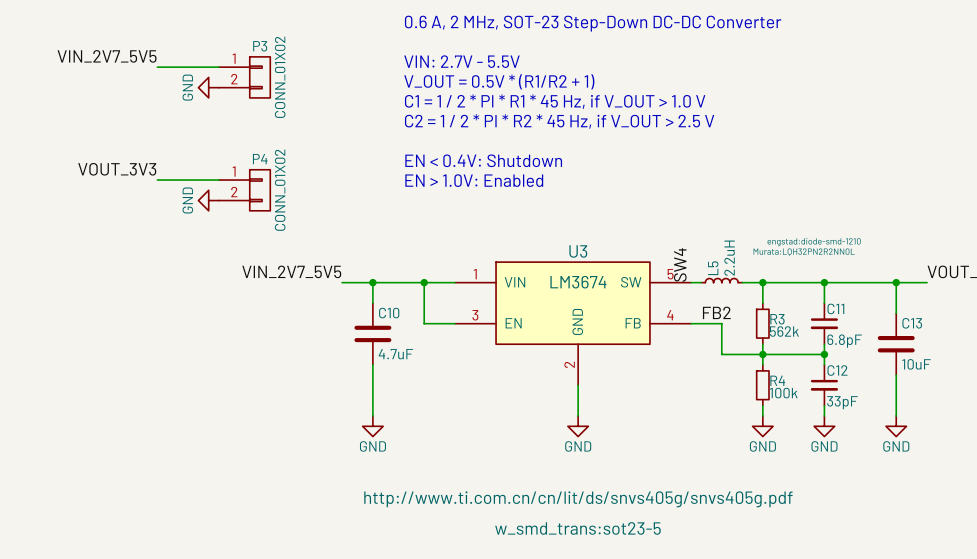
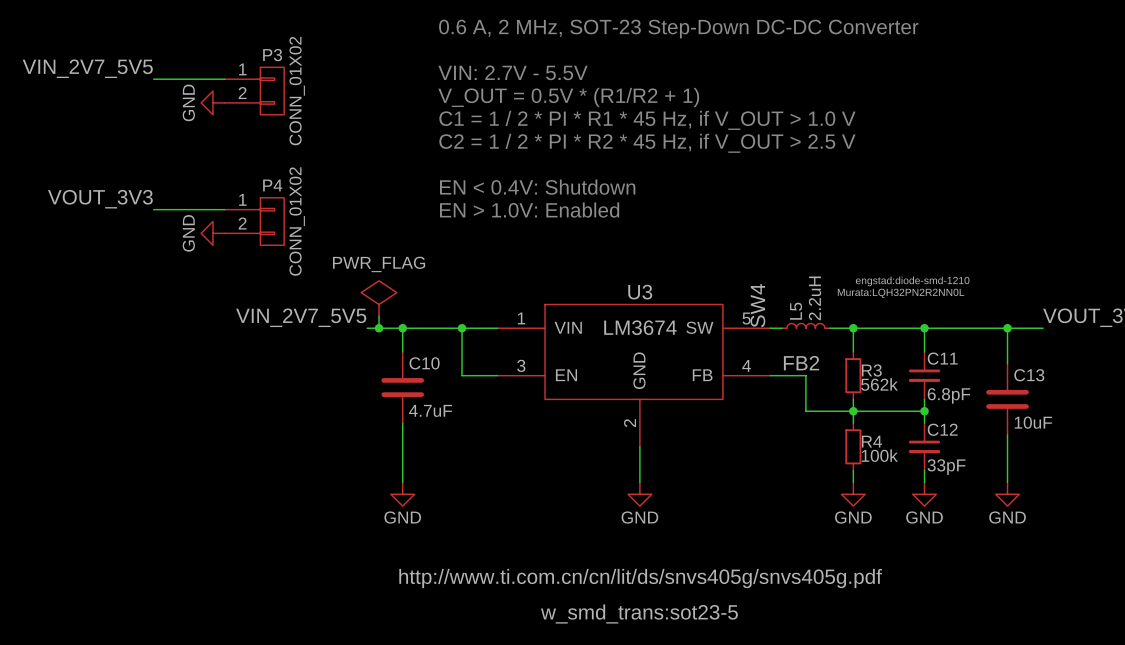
power symbol: none -> PWR_FLAG (379, 298)
wire: none -> (379, 316) (379, 328)
junction: none -> (379, 328)

